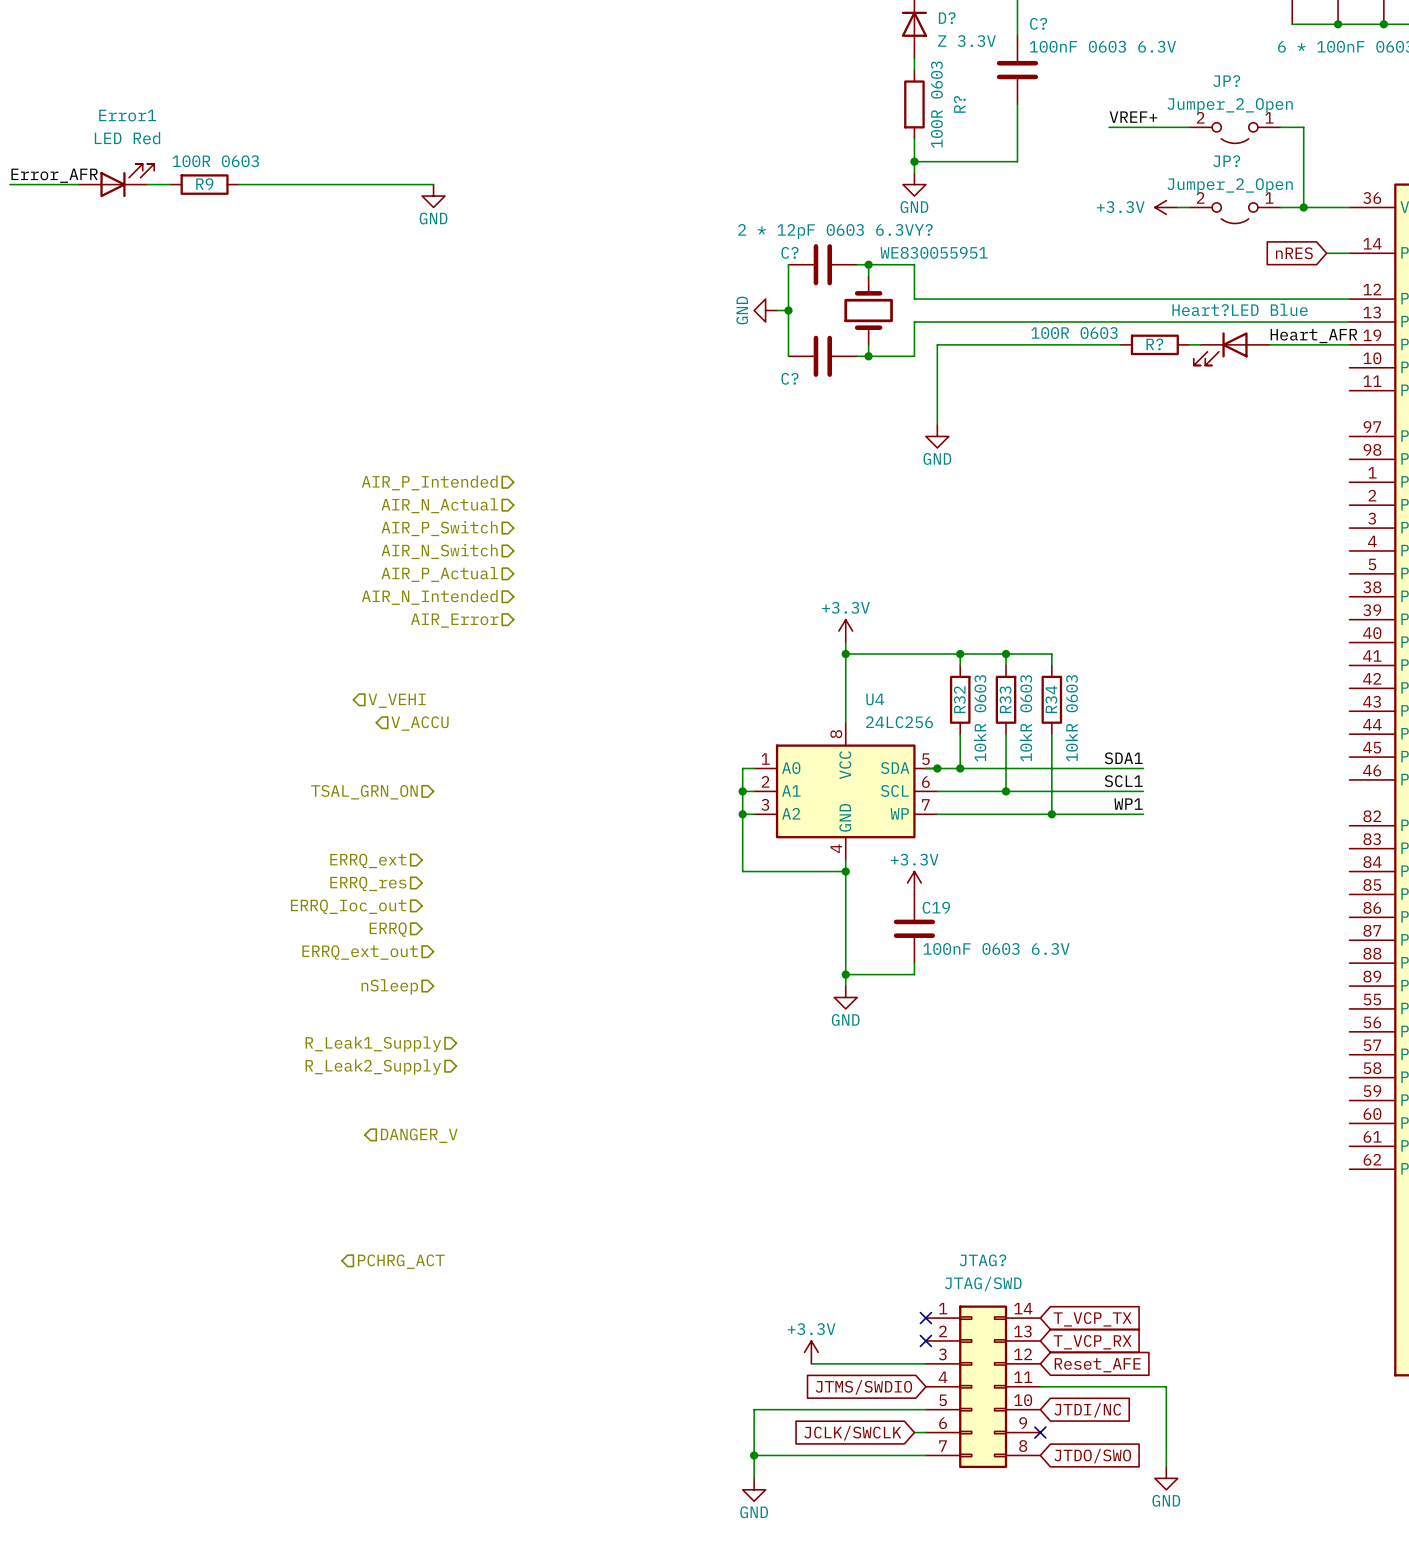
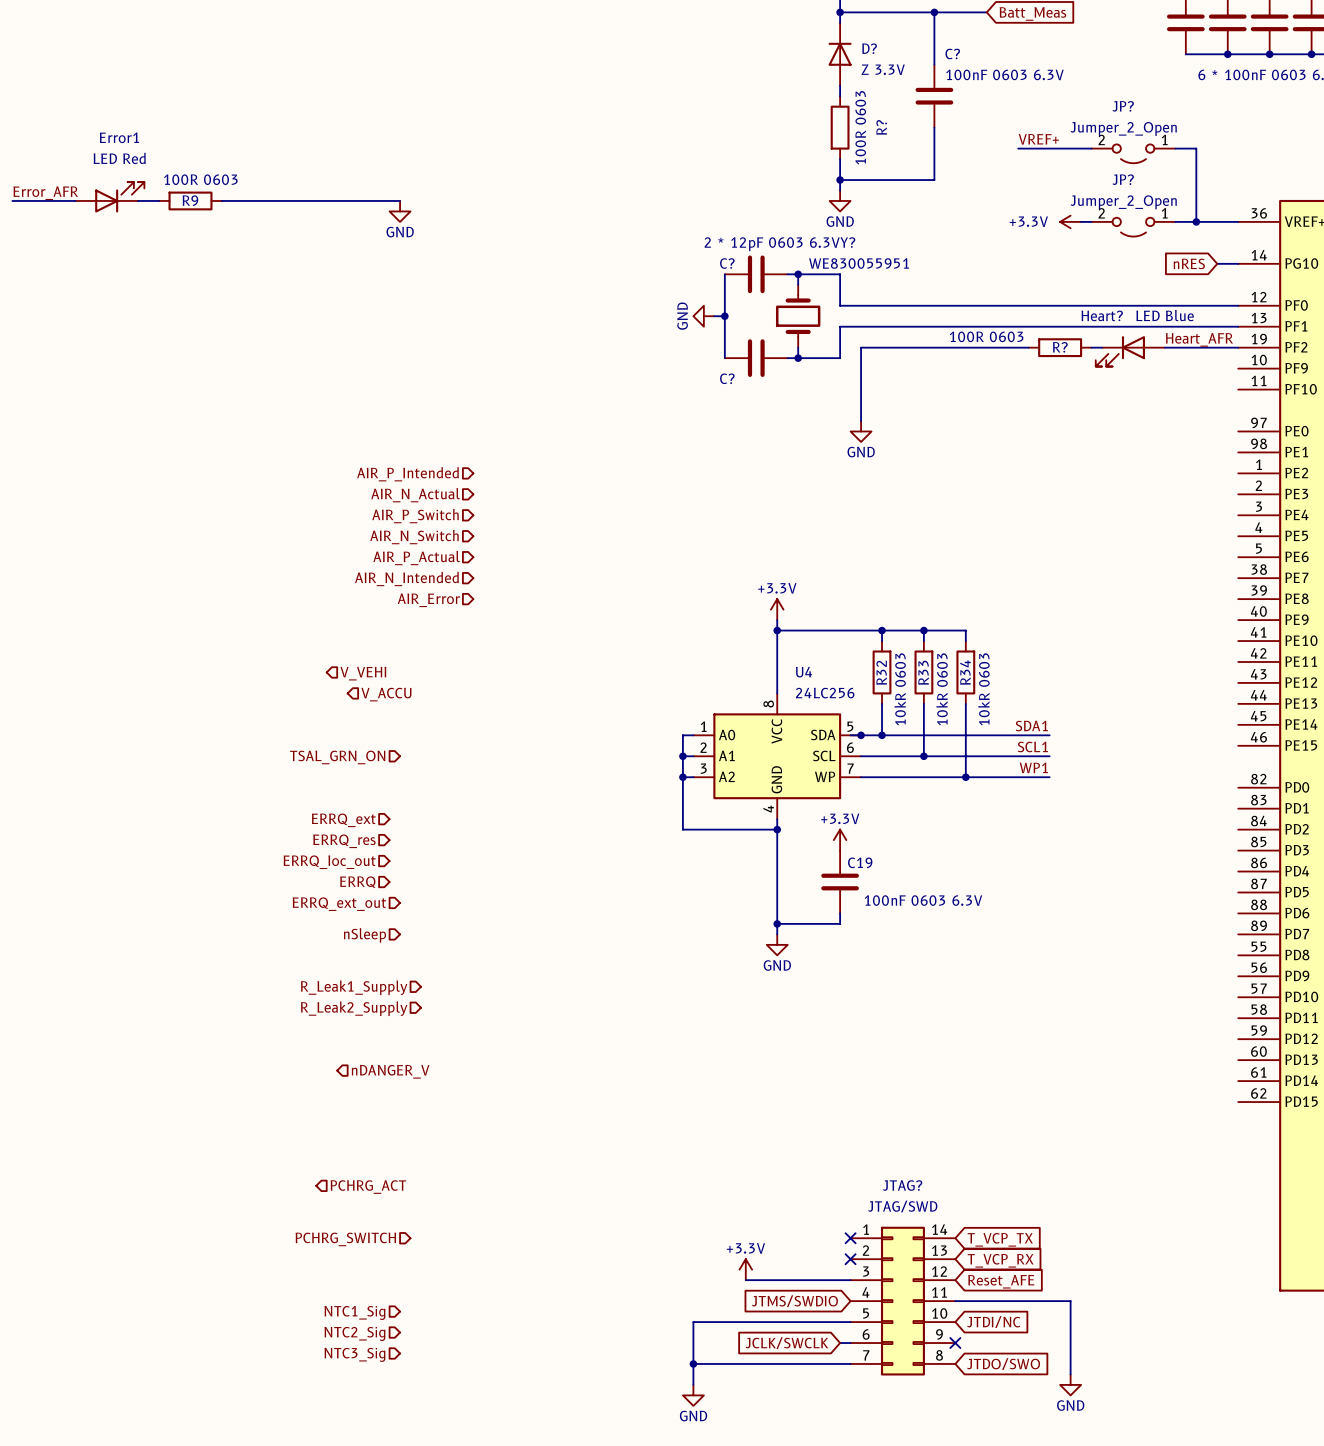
hierarchical label: DANGER_V (419, 1135) -> nDANGER_V (390, 1071)
hierarchical label: none -> PCHRG_SWITCH (345, 1239)
hierarchical label: none -> NTC1_Sig (354, 1312)
hierarchical label: none -> NTC2_Sig (354, 1333)
hierarchical label: none -> NTC3_Sig (354, 1354)

